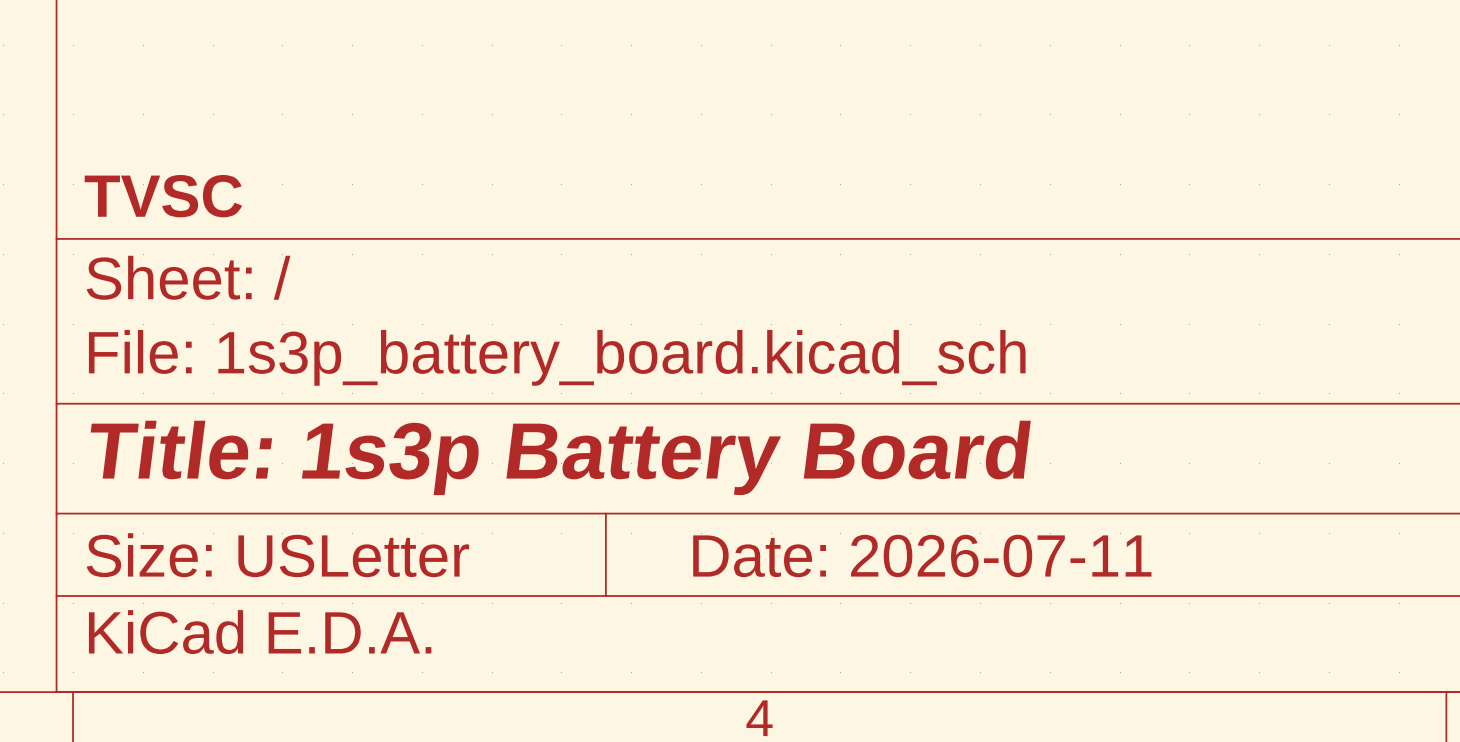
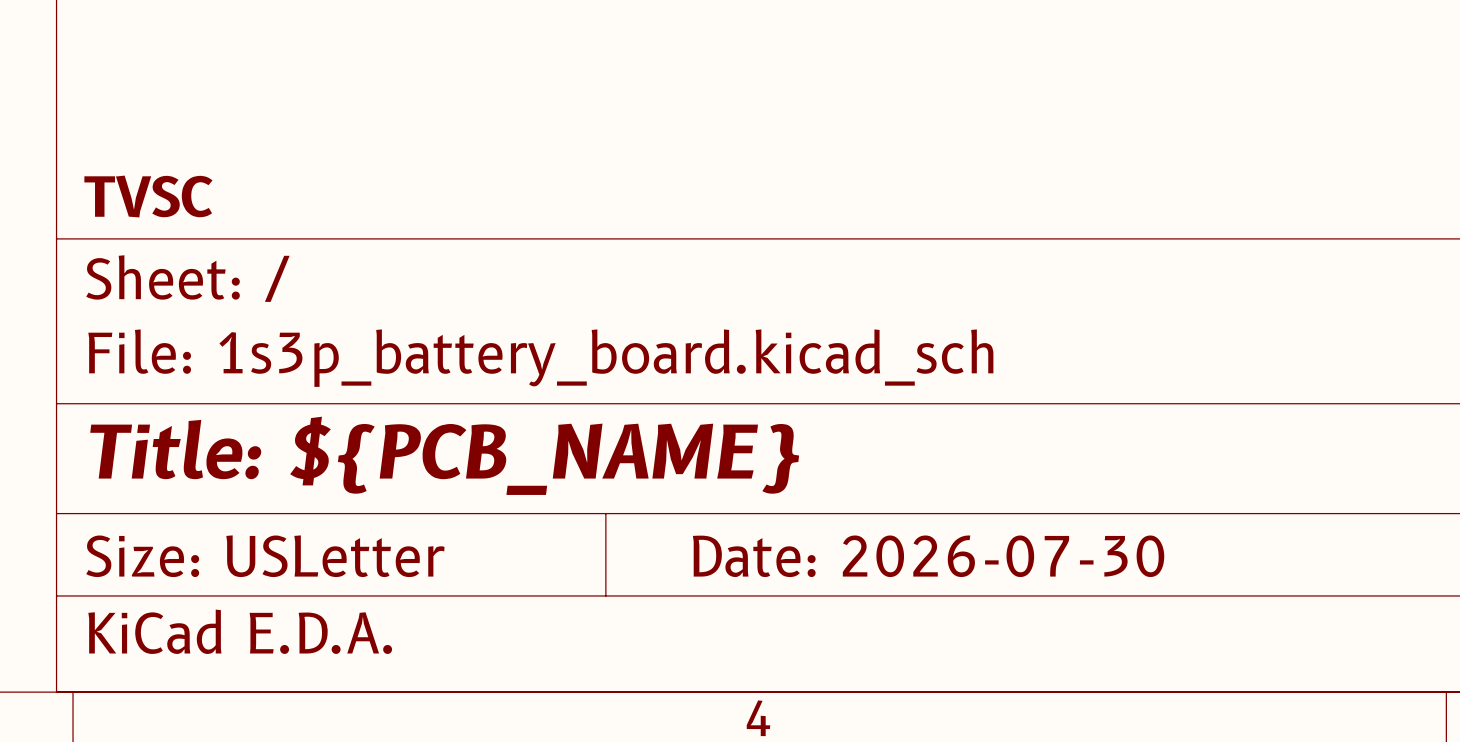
title block: Title: 1s3p Battery Board (560, 457) -> Title: ${PCB_NAME} (444, 455)
title block: Date: 2026-07-11 (922, 555) -> Date: 2026-07-30 (928, 556)

